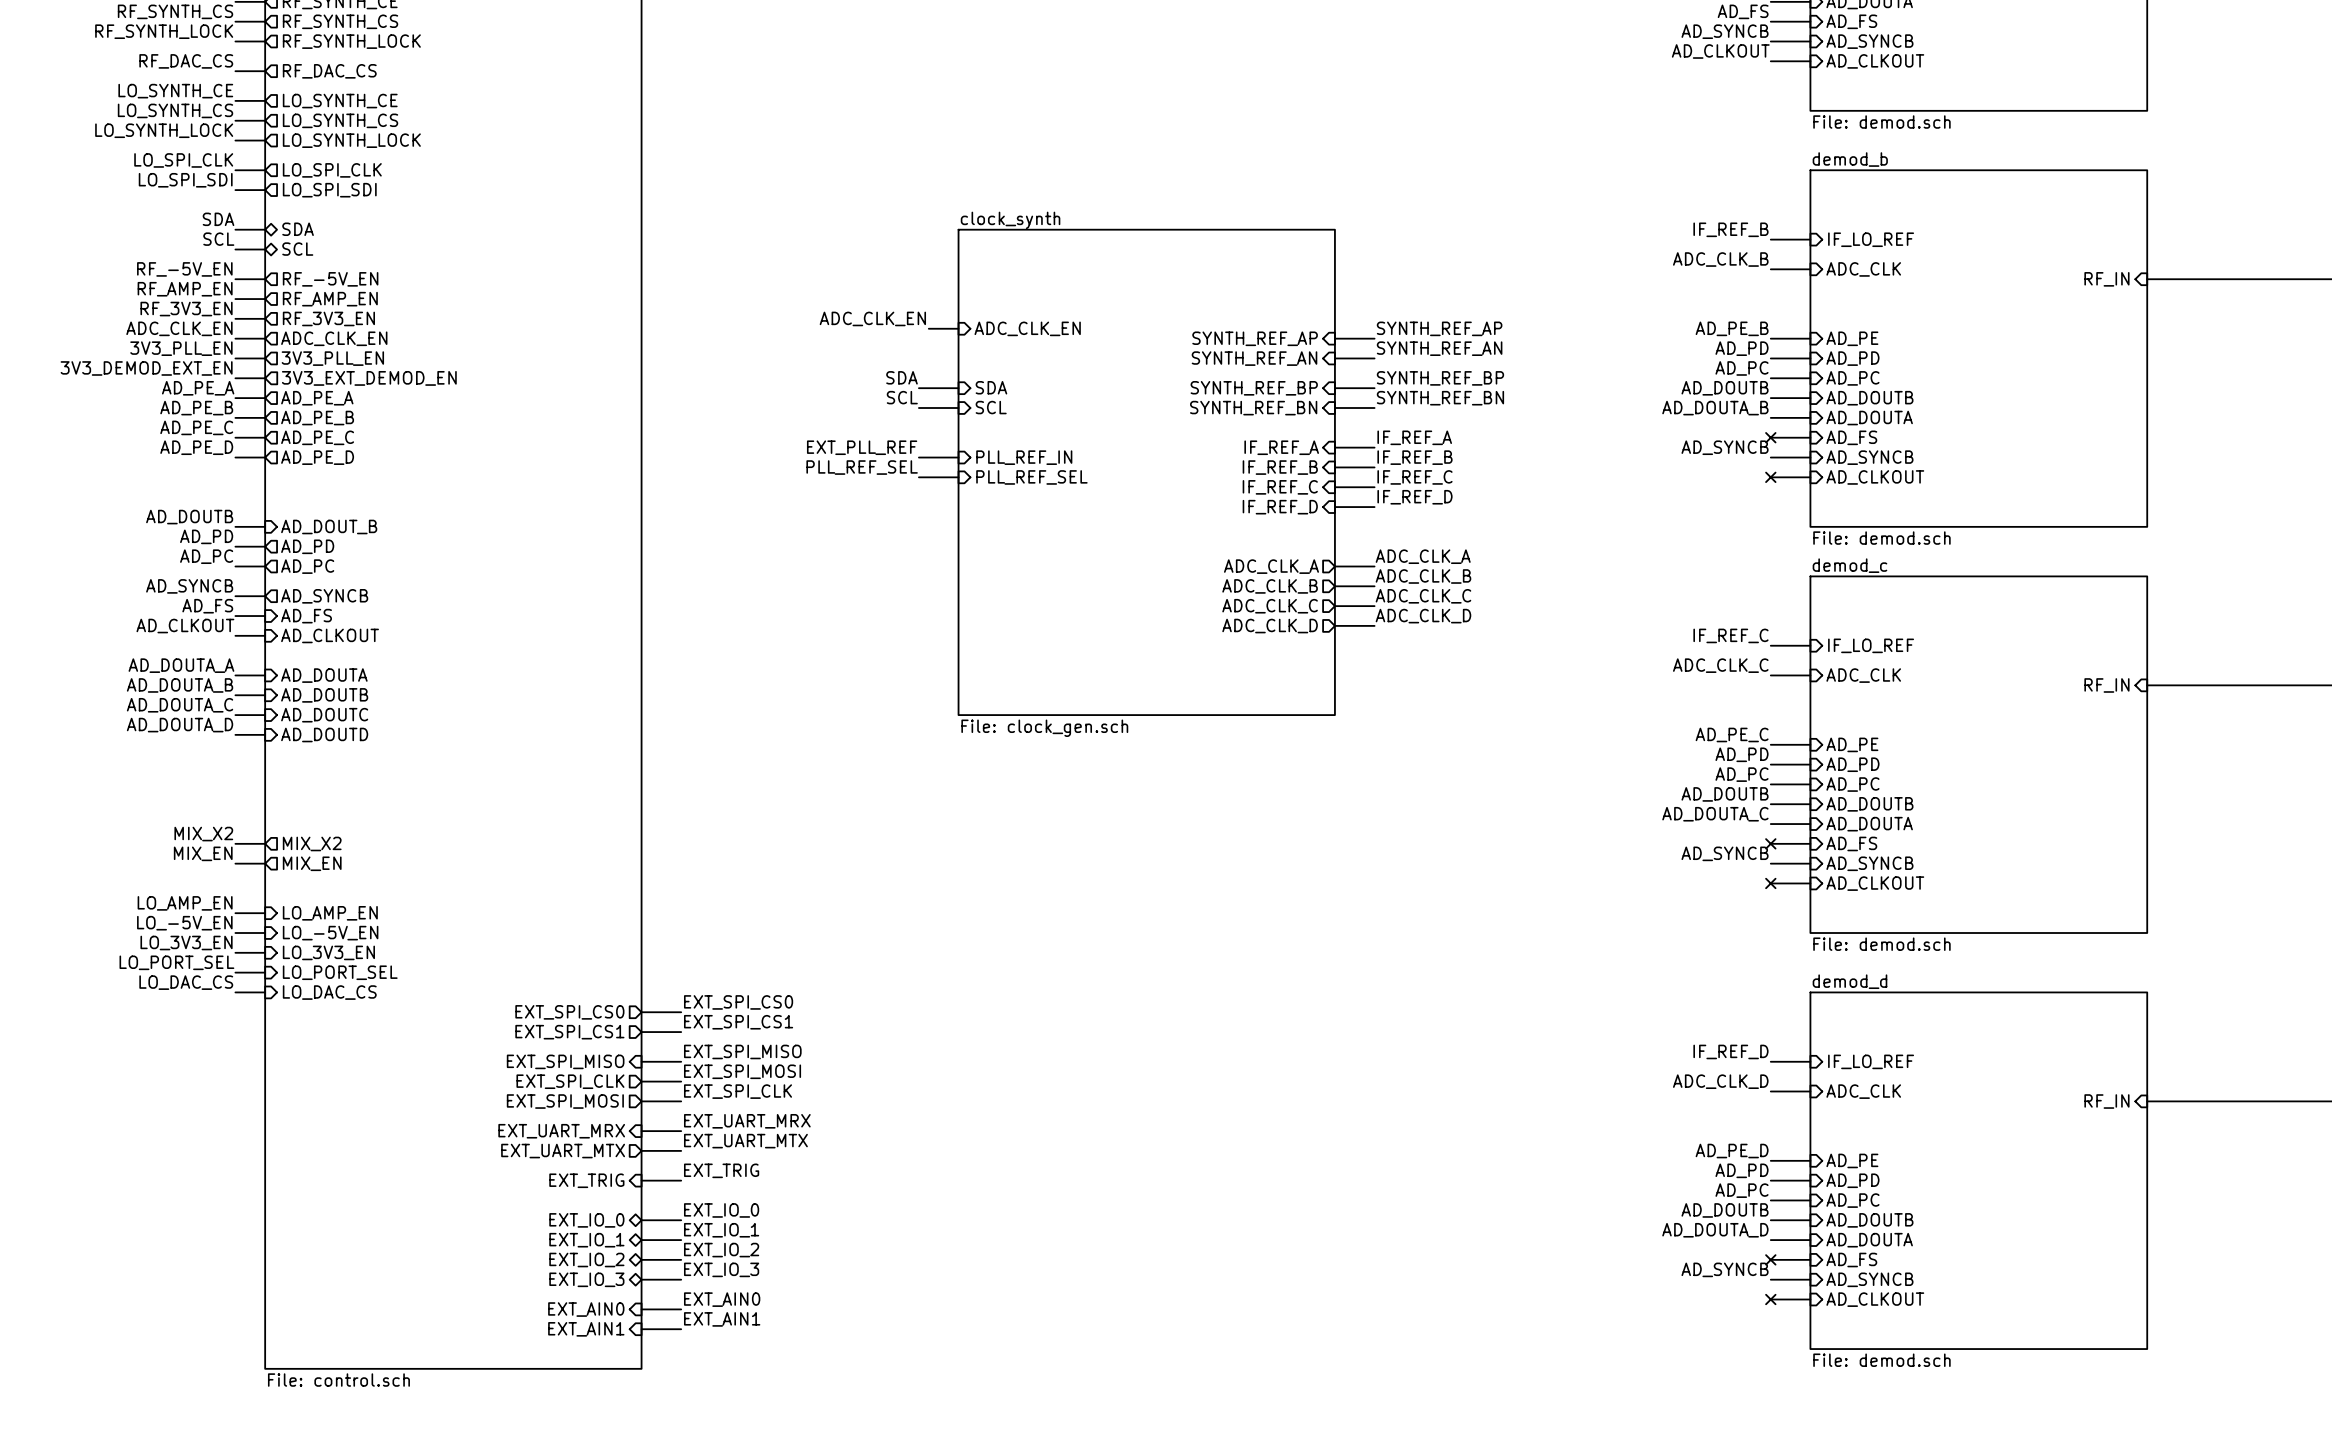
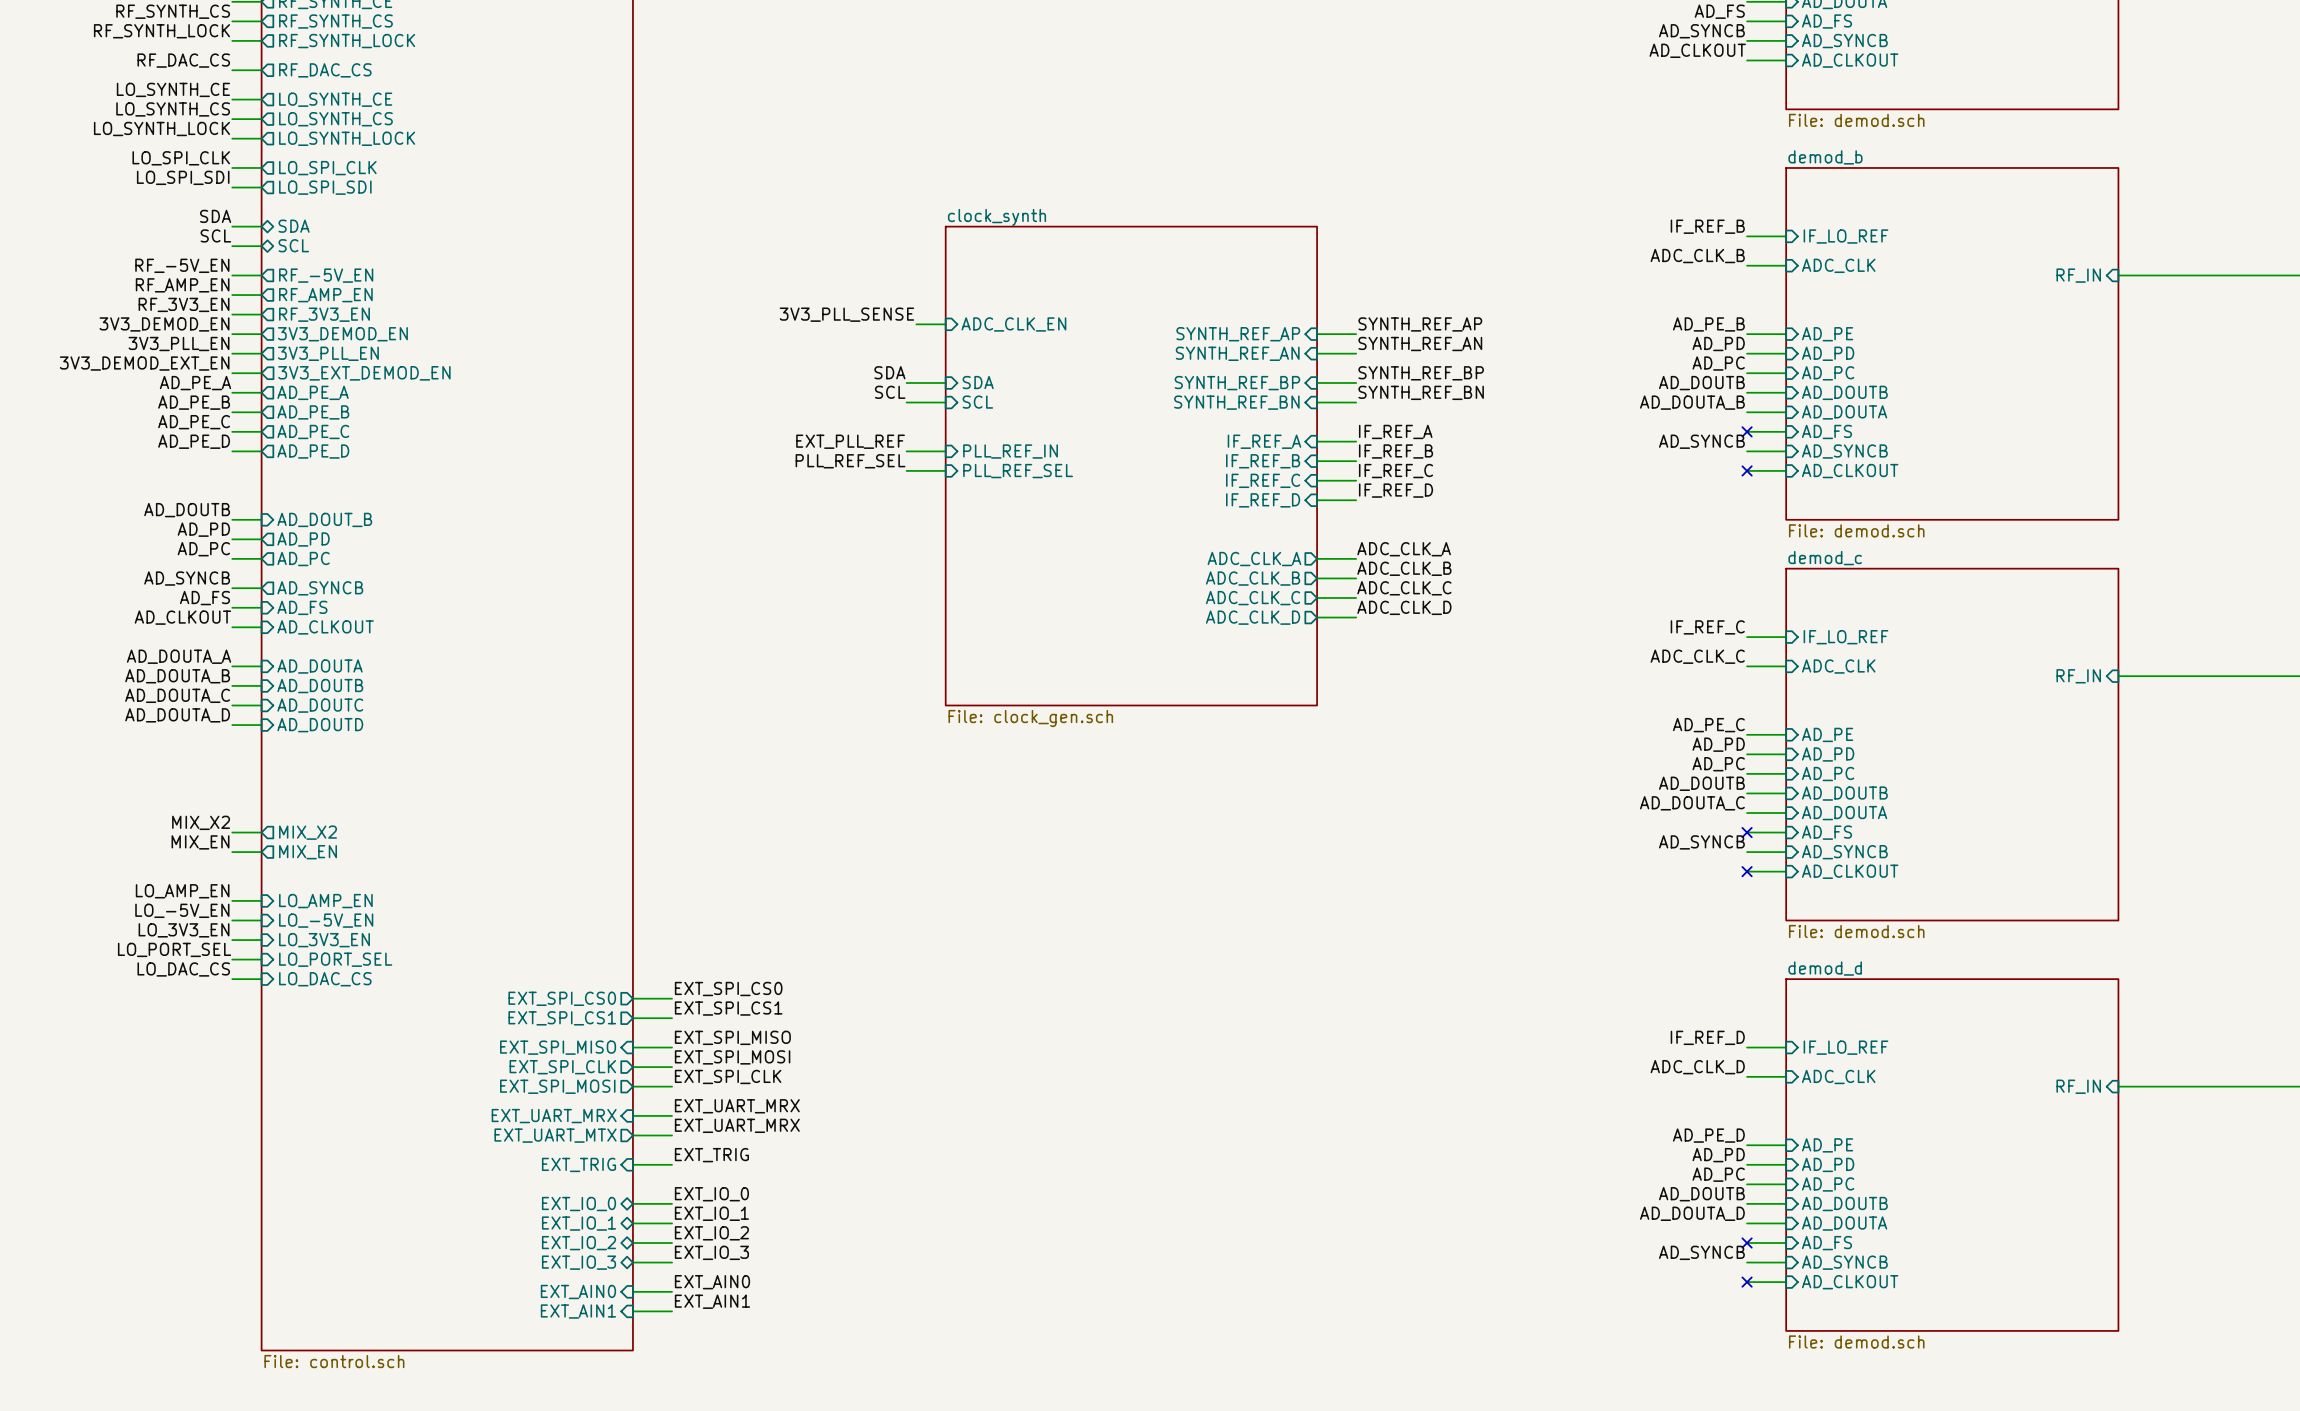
label: ADC_CLK_EN (872, 318) -> 3V3_PLL_SENSE (846, 314)
label: ADC_CLK_EN (179, 328) -> 3V3_DEMOD_EN (164, 324)
sheet pin: ADC_CLK_EN (334, 338) -> 3V3_DEMOD_EN (342, 334)
label: EXT_UART_MTX (745, 1141) -> EXT_UART_MRX (737, 1125)

